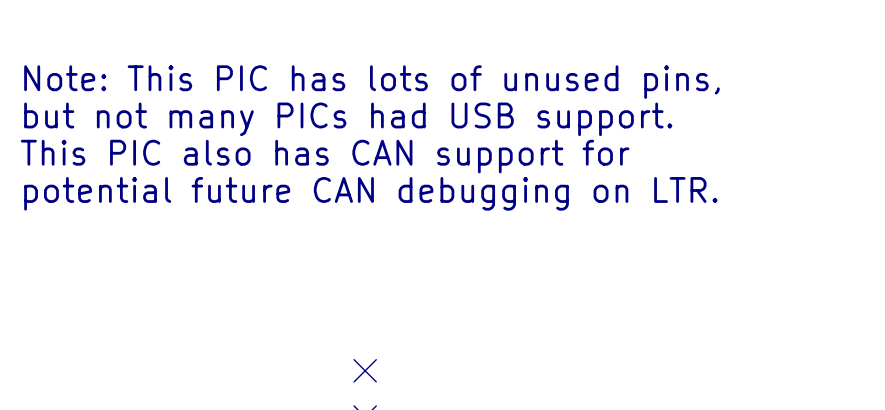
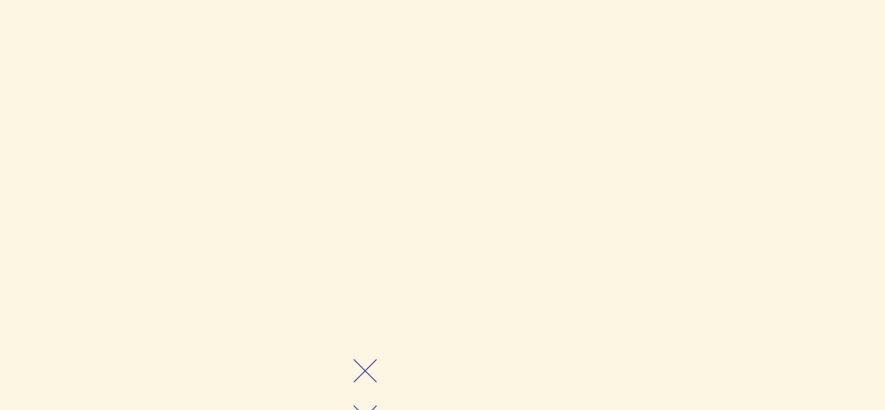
text: Note: This PIC has lots of unused pins, (371, 82) -> none
text: but not many PICs had USB support. (348, 119) -> none
text: This PIC also has CAN support for (325, 156) -> none
text: potential future CAN debugging on LTR. (370, 193) -> none

